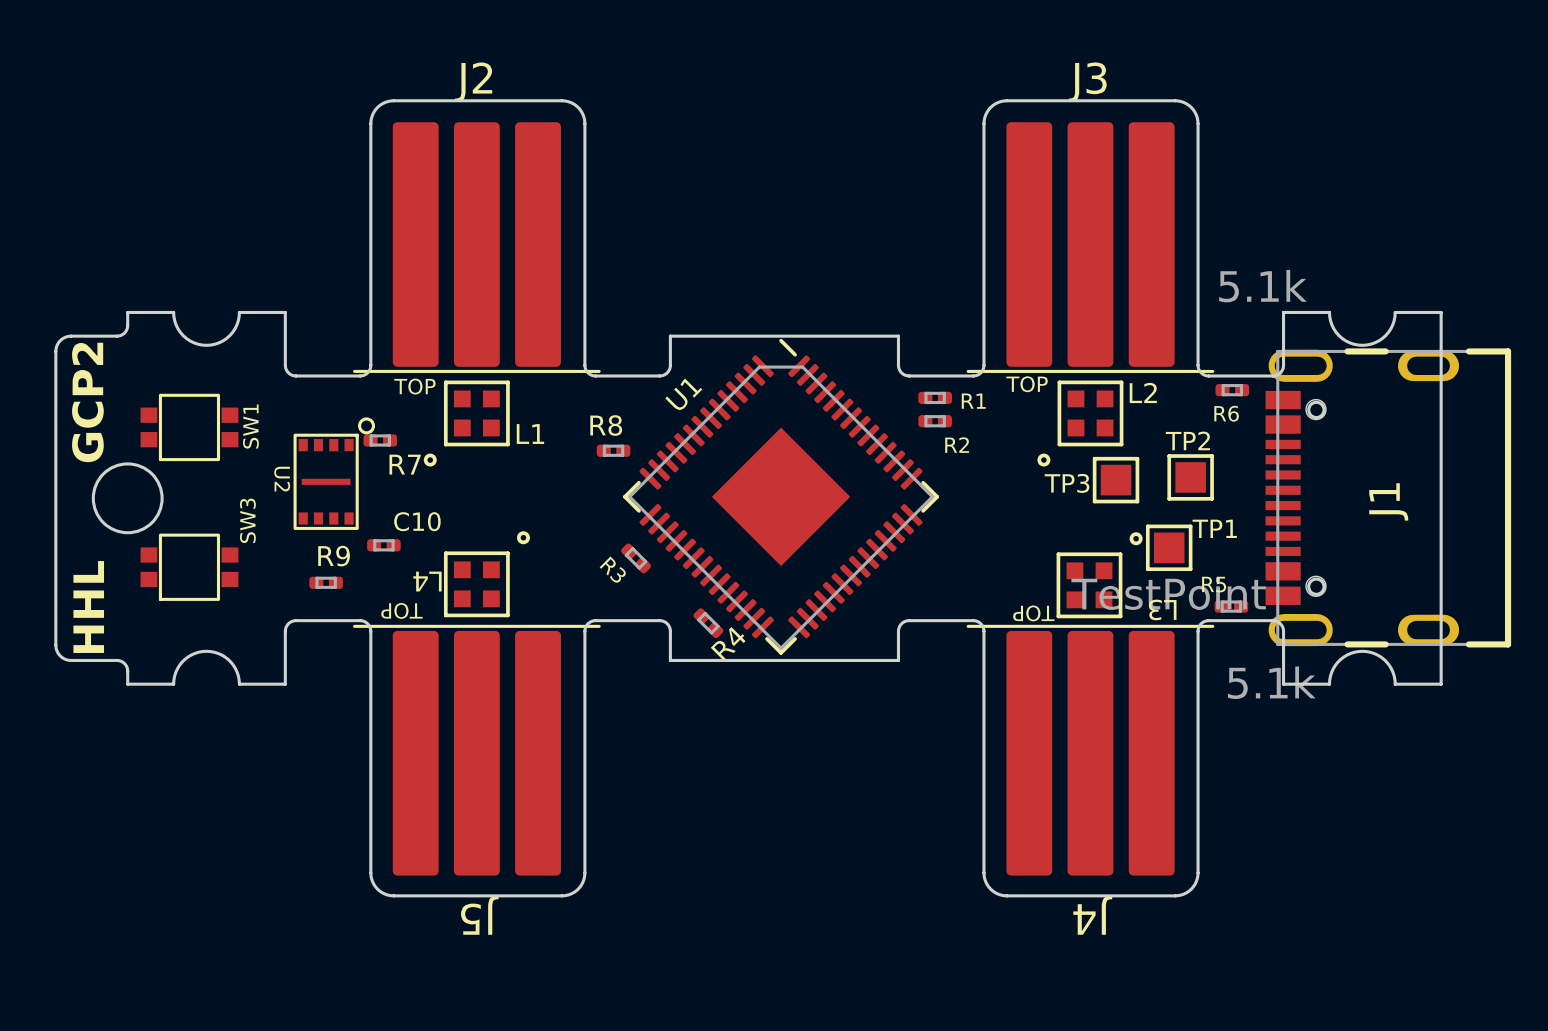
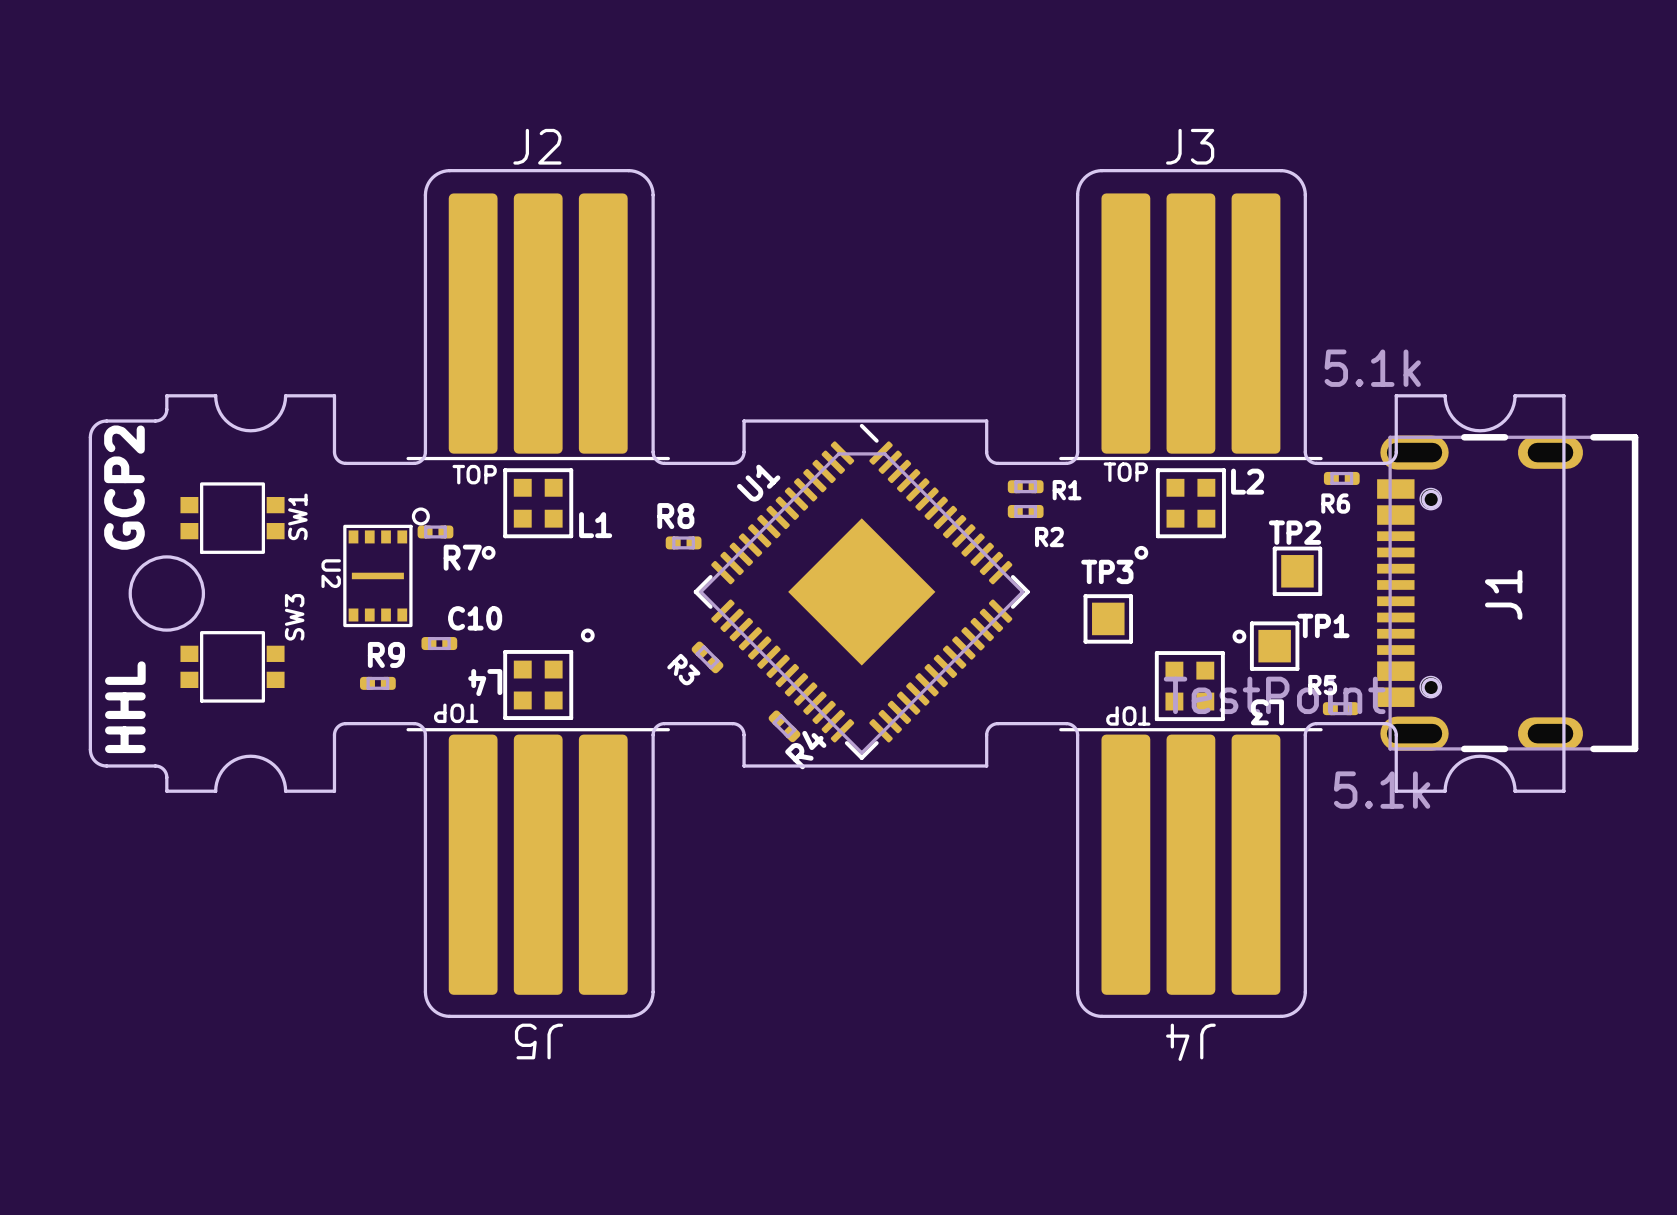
TP3 position: (1116, 480) -> (1108, 618)
TP3 name position: TP3 (1067, 483) -> TP3 (1107, 571)

